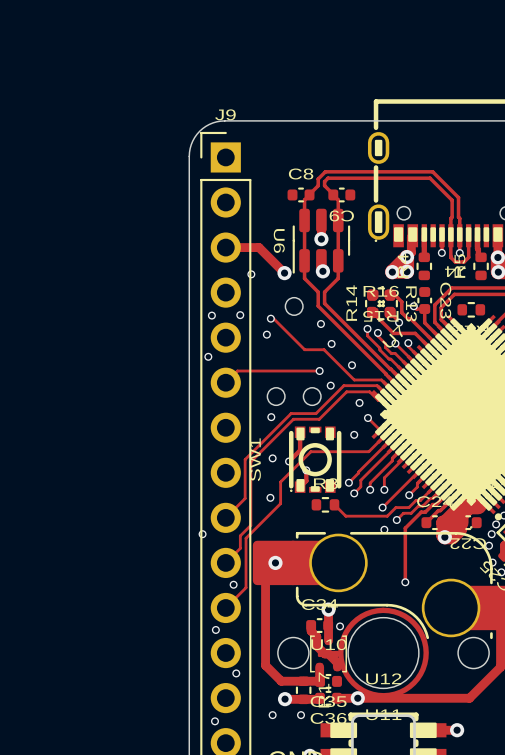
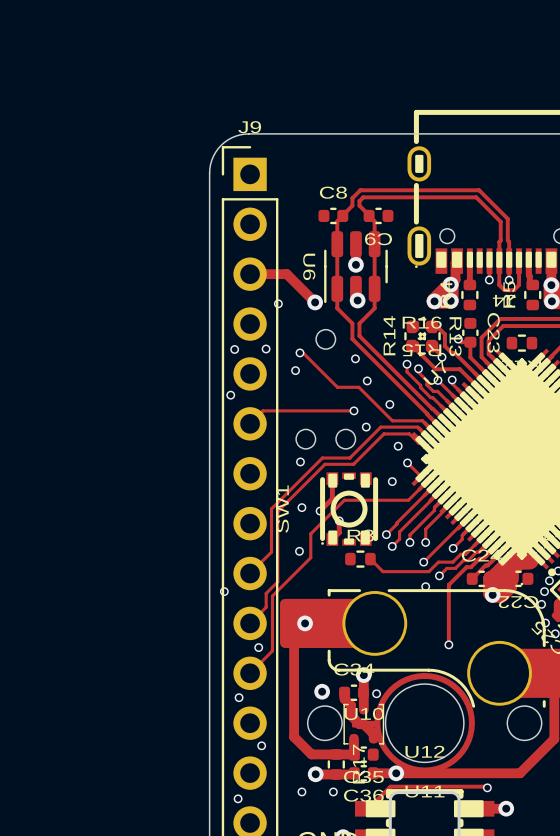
via: none -> (322, 691)
track: none -> (487, 787) (390, 786) (371, 805) (371, 808)
via: none -> (487, 787)

